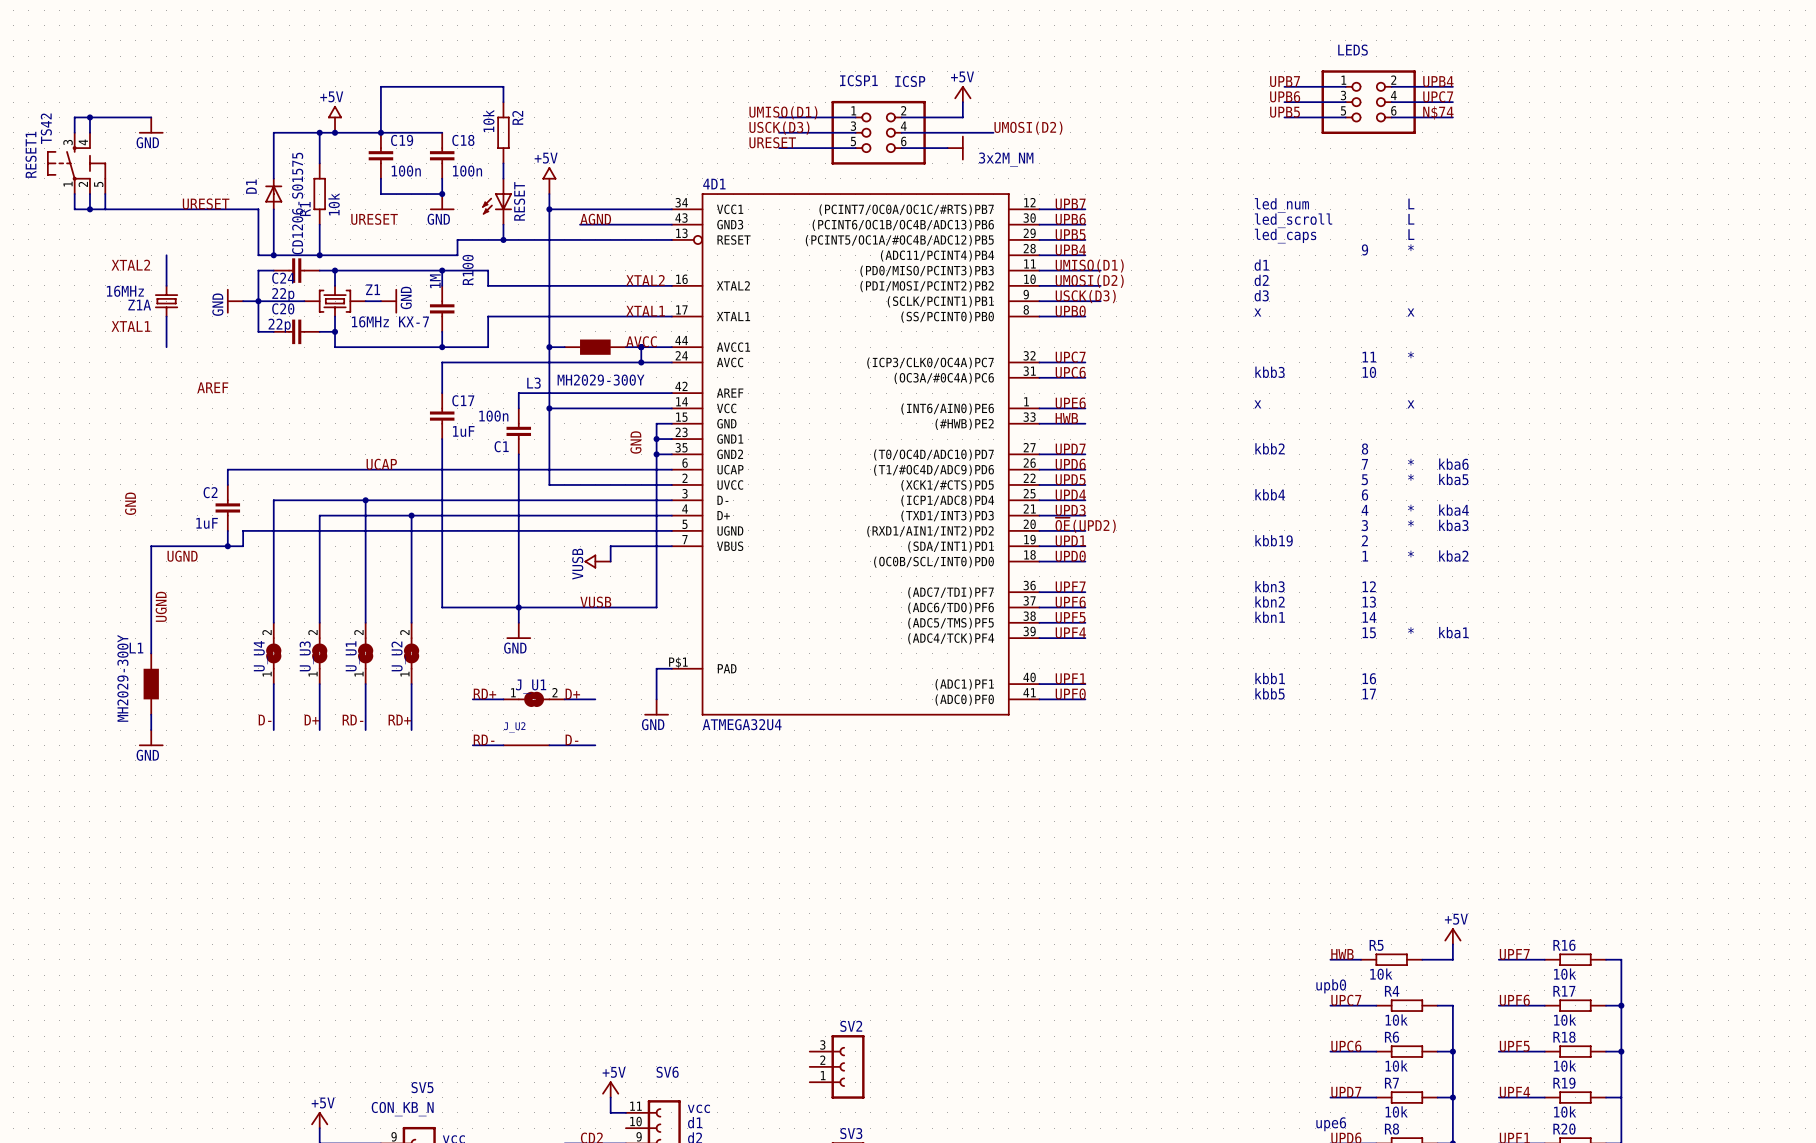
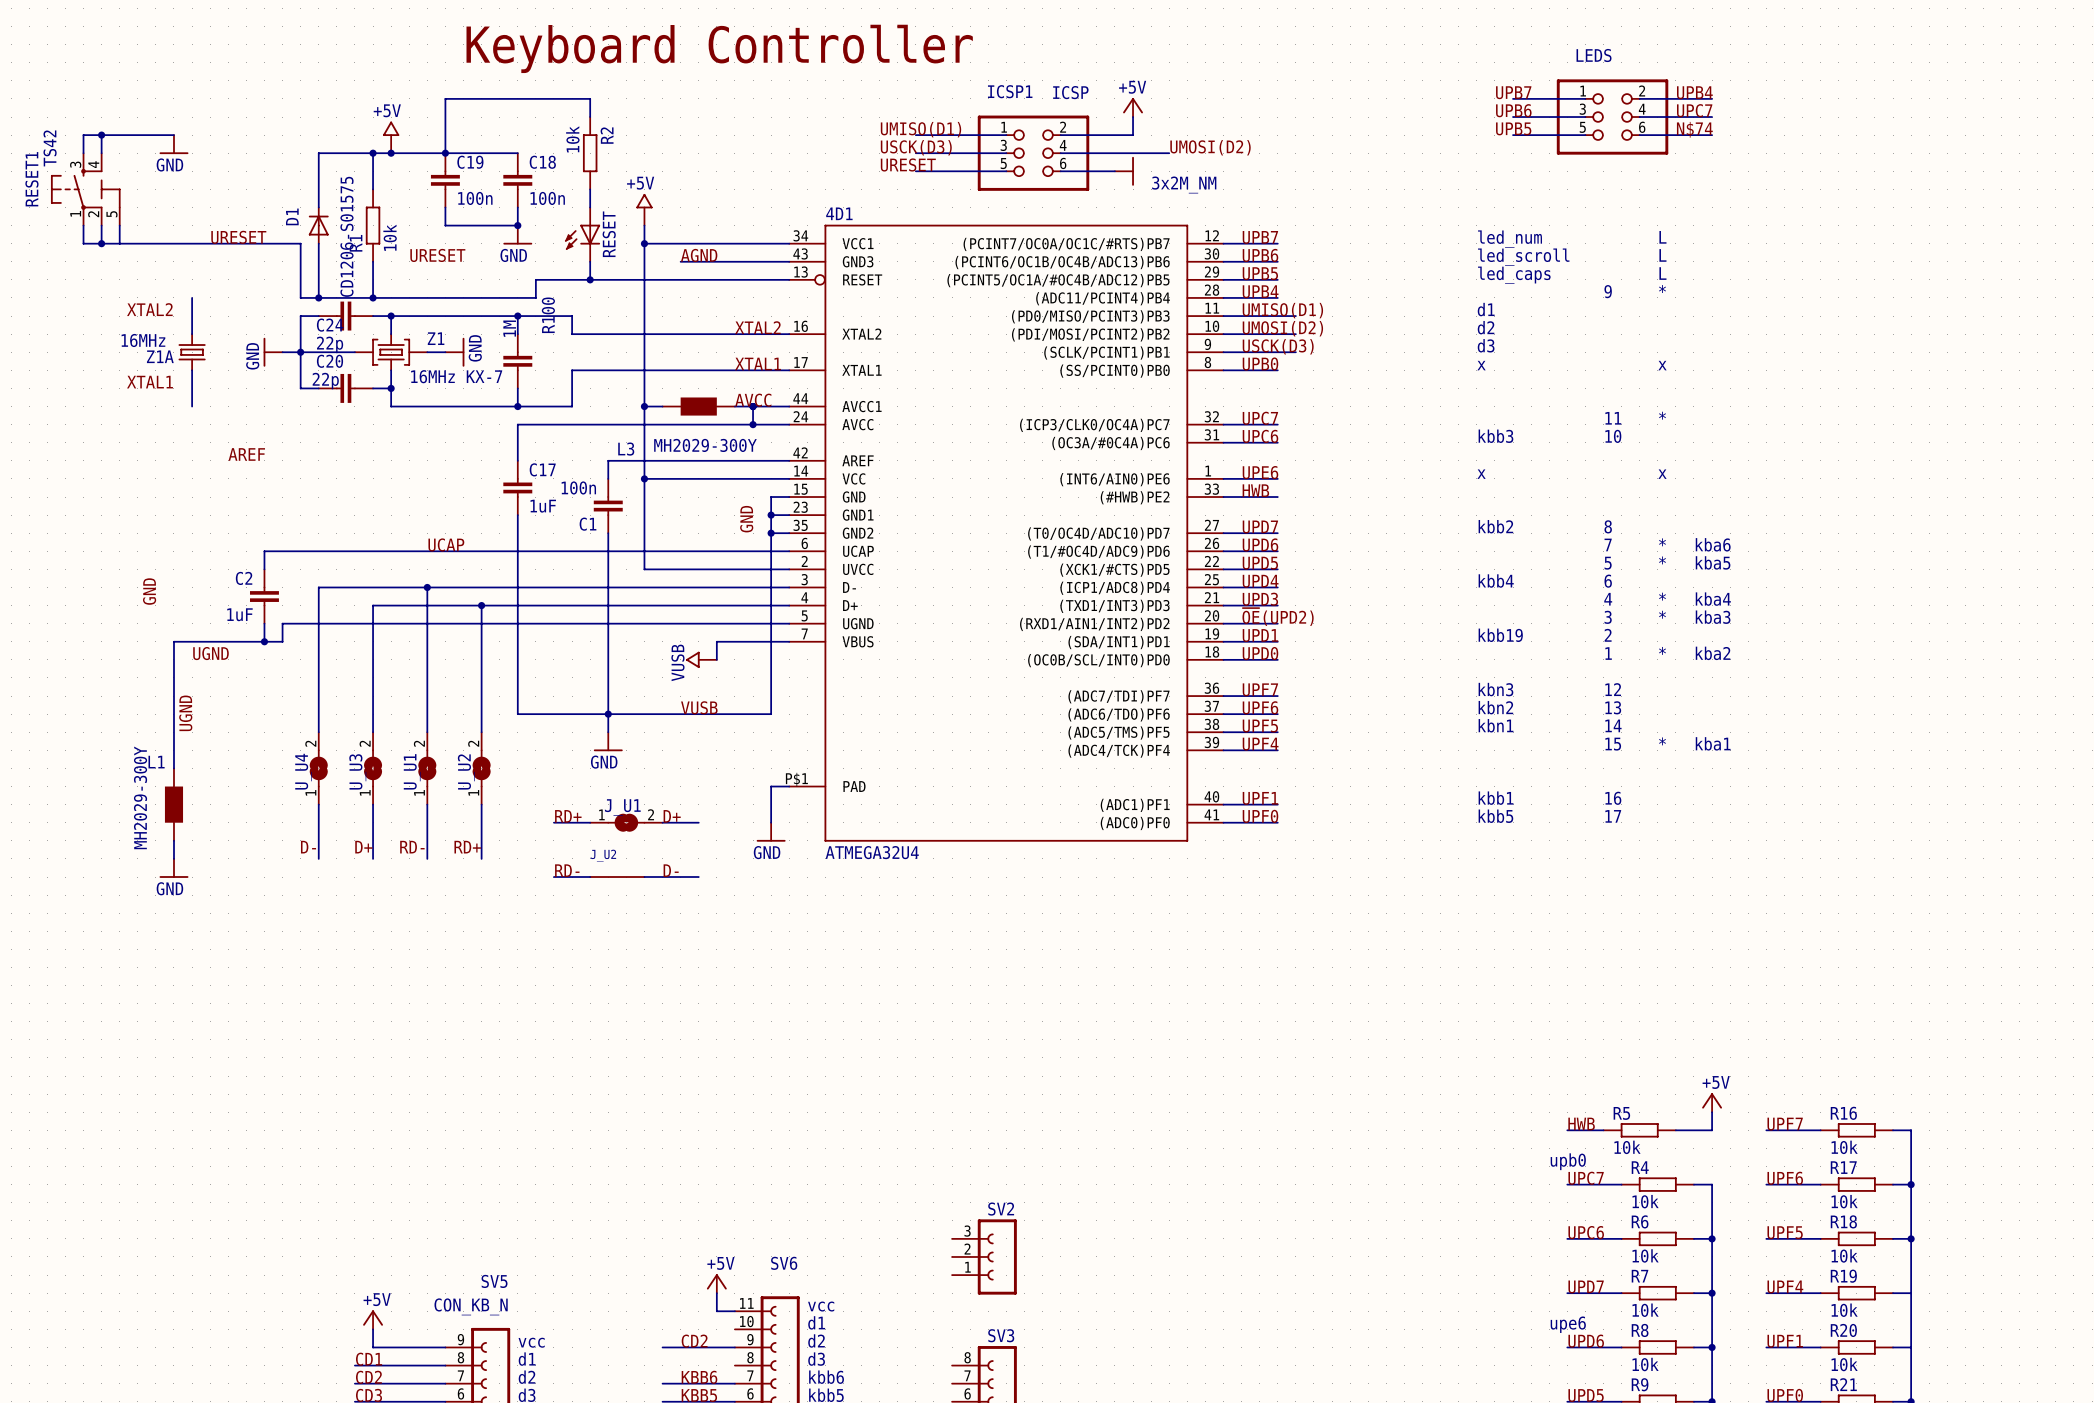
text: none -> Keyboard Controller (719, 48)

